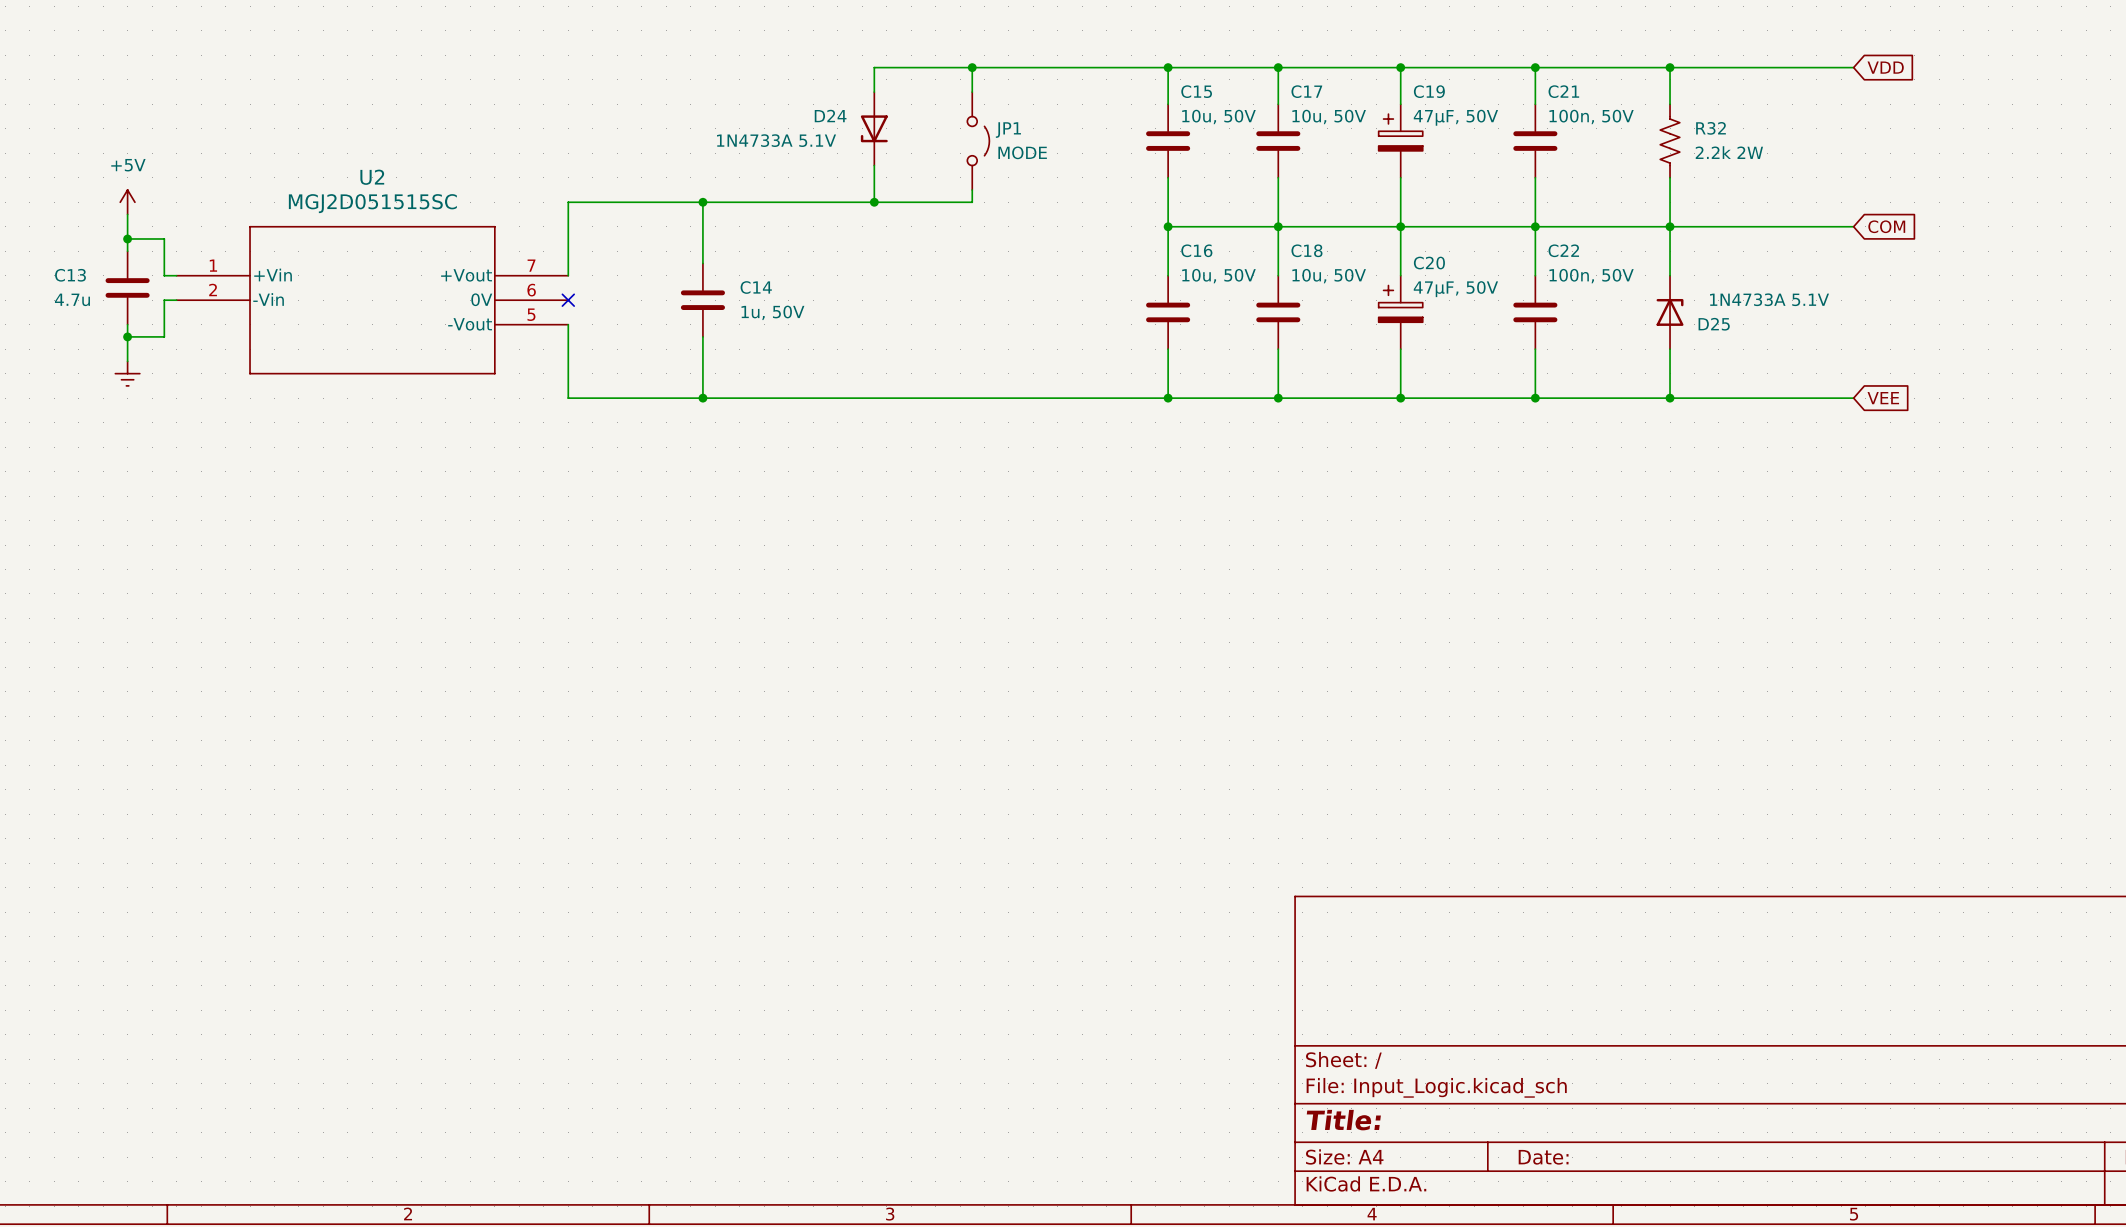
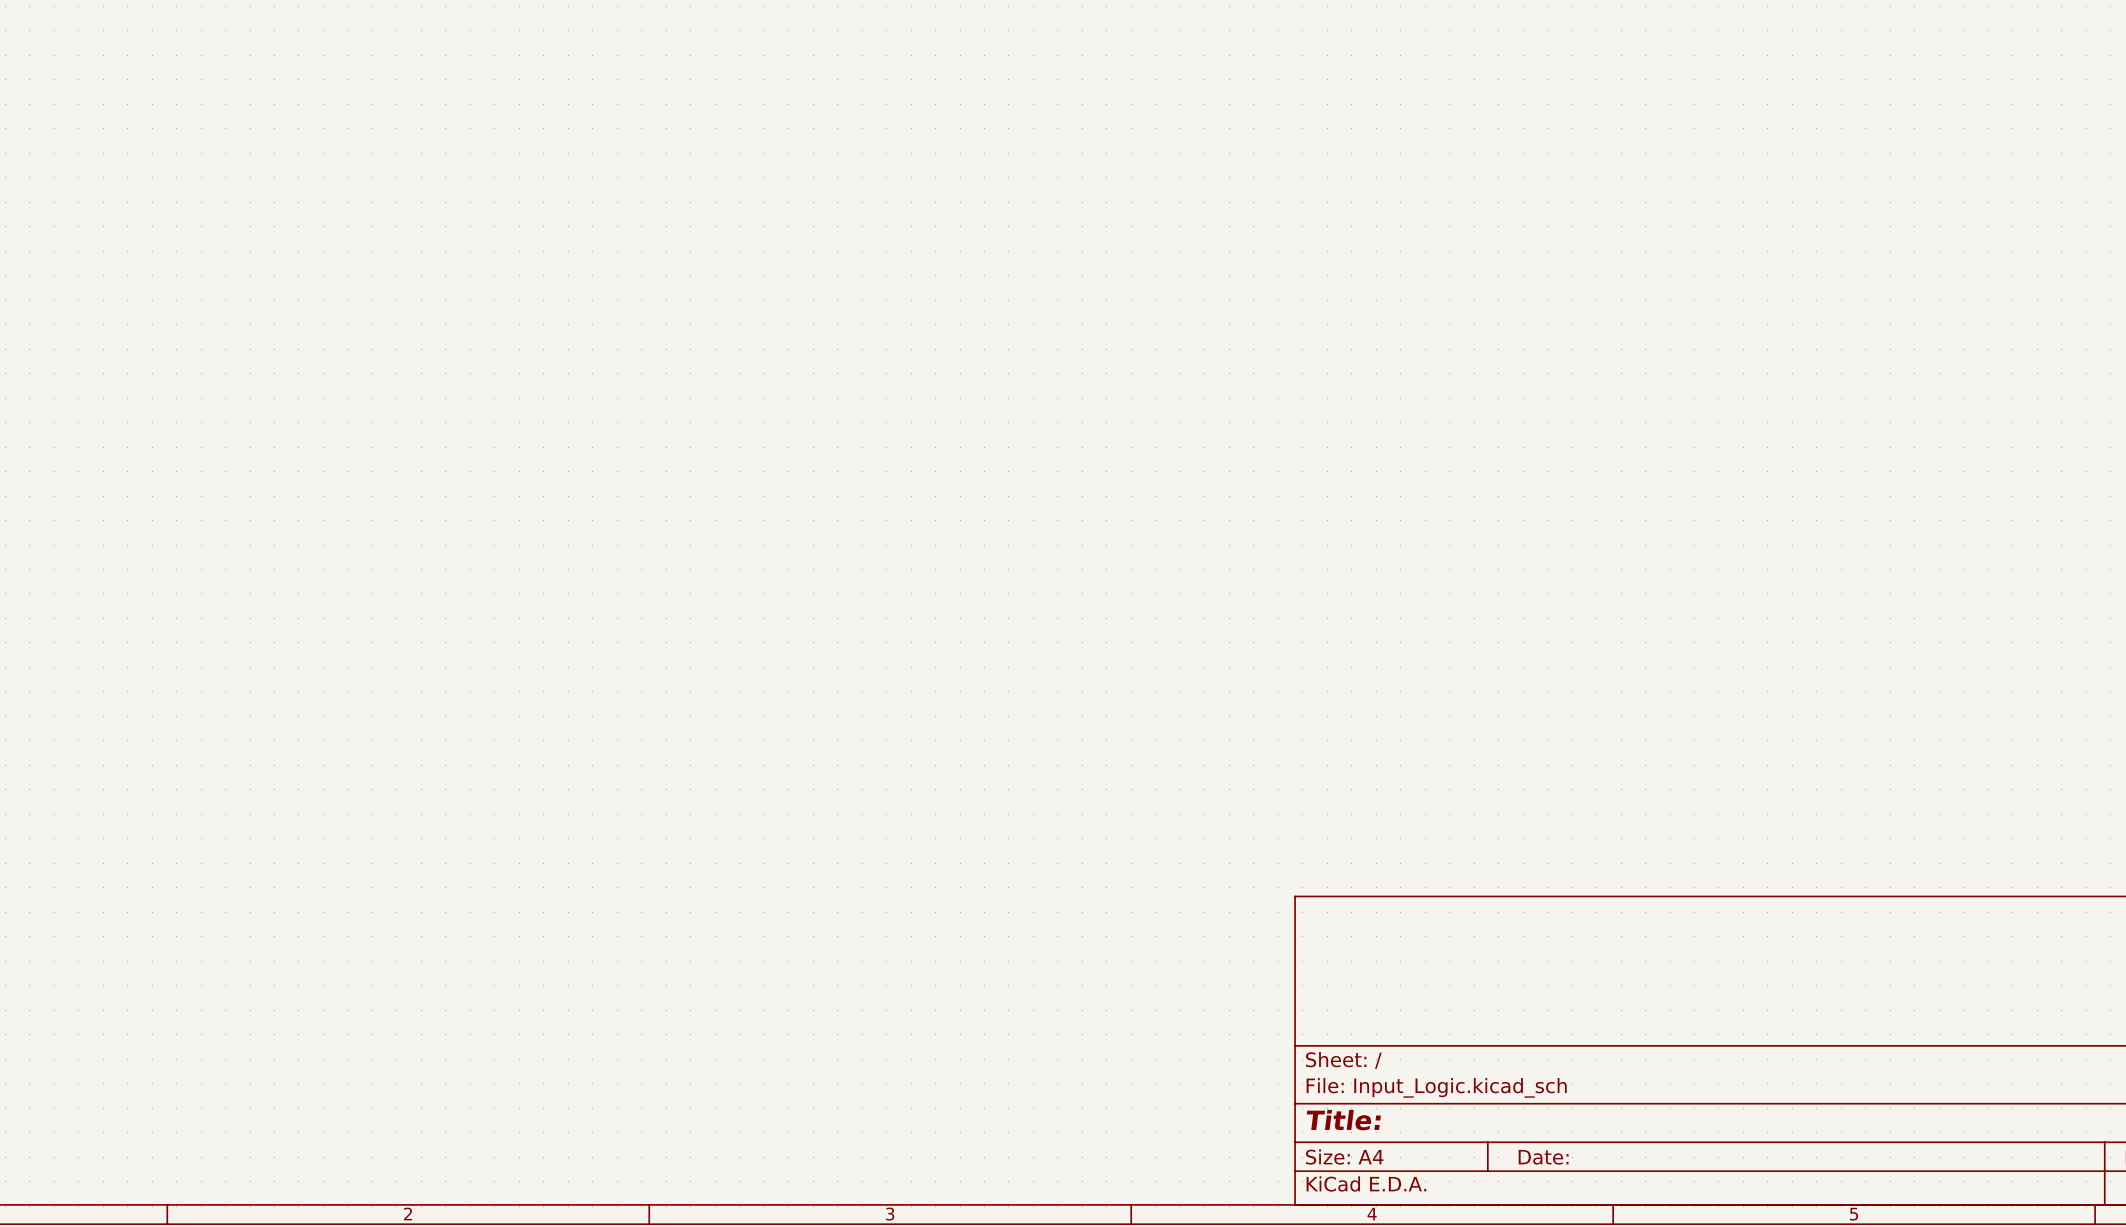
wire: (972, 67) (972, 92) -> none
junction: (972, 67) -> none
wire: (1168, 67) (1168, 104) -> none
junction: (1168, 67) -> none
wire: (1278, 67) (1278, 104) -> none
junction: (1278, 67) -> none
wire: (1400, 67) (1400, 104) -> none
junction: (1400, 67) -> none
wire: (1535, 67) (1535, 104) -> none
junction: (1535, 67) -> none
wire: (1670, 67) (1670, 104) -> none
junction: (1670, 67) -> none
wire: (1853, 67) (874, 67) (874, 92) -> none
global label: VDD (1885, 67) -> none
D24: 1N4733A 5.1V (874, 128) -> none
JP1: MODE (978, 141) -> none
C15: 10u, 50V (1168, 141) -> none
C17: 10u, 50V (1278, 141) -> none
C19: 47µF, 50V (1400, 141) -> none
C21: 100n, 50V (1535, 141) -> none
R32: 2.2k 2W (1670, 141) -> none
wire: (874, 165) (874, 202) -> none
wire: (1168, 177) (1168, 275) -> none
wire: (1278, 177) (1278, 275) -> none
wire: (1400, 177) (1400, 275) -> none
wire: (1535, 177) (1535, 275) -> none
wire: (1670, 177) (1670, 275) -> none
wire: (972, 190) (972, 202) (568, 202) (568, 275) -> none
power symbol: +5V (127, 202) -> none
wire: (702, 202) (702, 263) -> none
junction: (702, 202) -> none
junction: (874, 202) -> none
wire: (127, 214) (127, 251) -> none
wire: (1168, 226) (1853, 226) -> none
junction: (1168, 226) -> none
junction: (1278, 226) -> none
junction: (1400, 226) -> none
junction: (1535, 226) -> none
junction: (1670, 226) -> none
global label: COM (1886, 226) -> none
wire: (127, 238) (164, 238) (164, 275) (176, 275) -> none
junction: (127, 238) -> none
C13: 4.7u (127, 287) -> none
wire: (176, 300) (164, 300) (164, 336) (127, 336) -> none
U2: MGJ2D051515SC (372, 300) -> none
no-connect mark: (568, 300) -> none
C14: 1u, 50V (702, 300) -> none
C16: 10u, 50V (1168, 312) -> none
C18: 10u, 50V (1278, 312) -> none
C20: 47µF, 50V (1400, 312) -> none
C22: 100n, 50V (1535, 312) -> none
D25: 1N4733A 5.1V (1670, 312) -> none
wire: (127, 324) (127, 361) -> none
wire: (568, 324) (568, 398) (1853, 398) -> none
junction: (127, 336) -> none
wire: (702, 336) (702, 398) -> none
wire: (1168, 349) (1168, 398) -> none
wire: (1278, 349) (1278, 398) -> none
wire: (1400, 349) (1400, 398) -> none
wire: (1535, 349) (1535, 398) -> none
wire: (1670, 349) (1670, 398) -> none
power symbol: (127, 373) -> none
junction: (702, 398) -> none
junction: (1168, 398) -> none
junction: (1278, 398) -> none
junction: (1400, 398) -> none
junction: (1535, 398) -> none
junction: (1670, 398) -> none
global label: VEE (1883, 398) -> none

